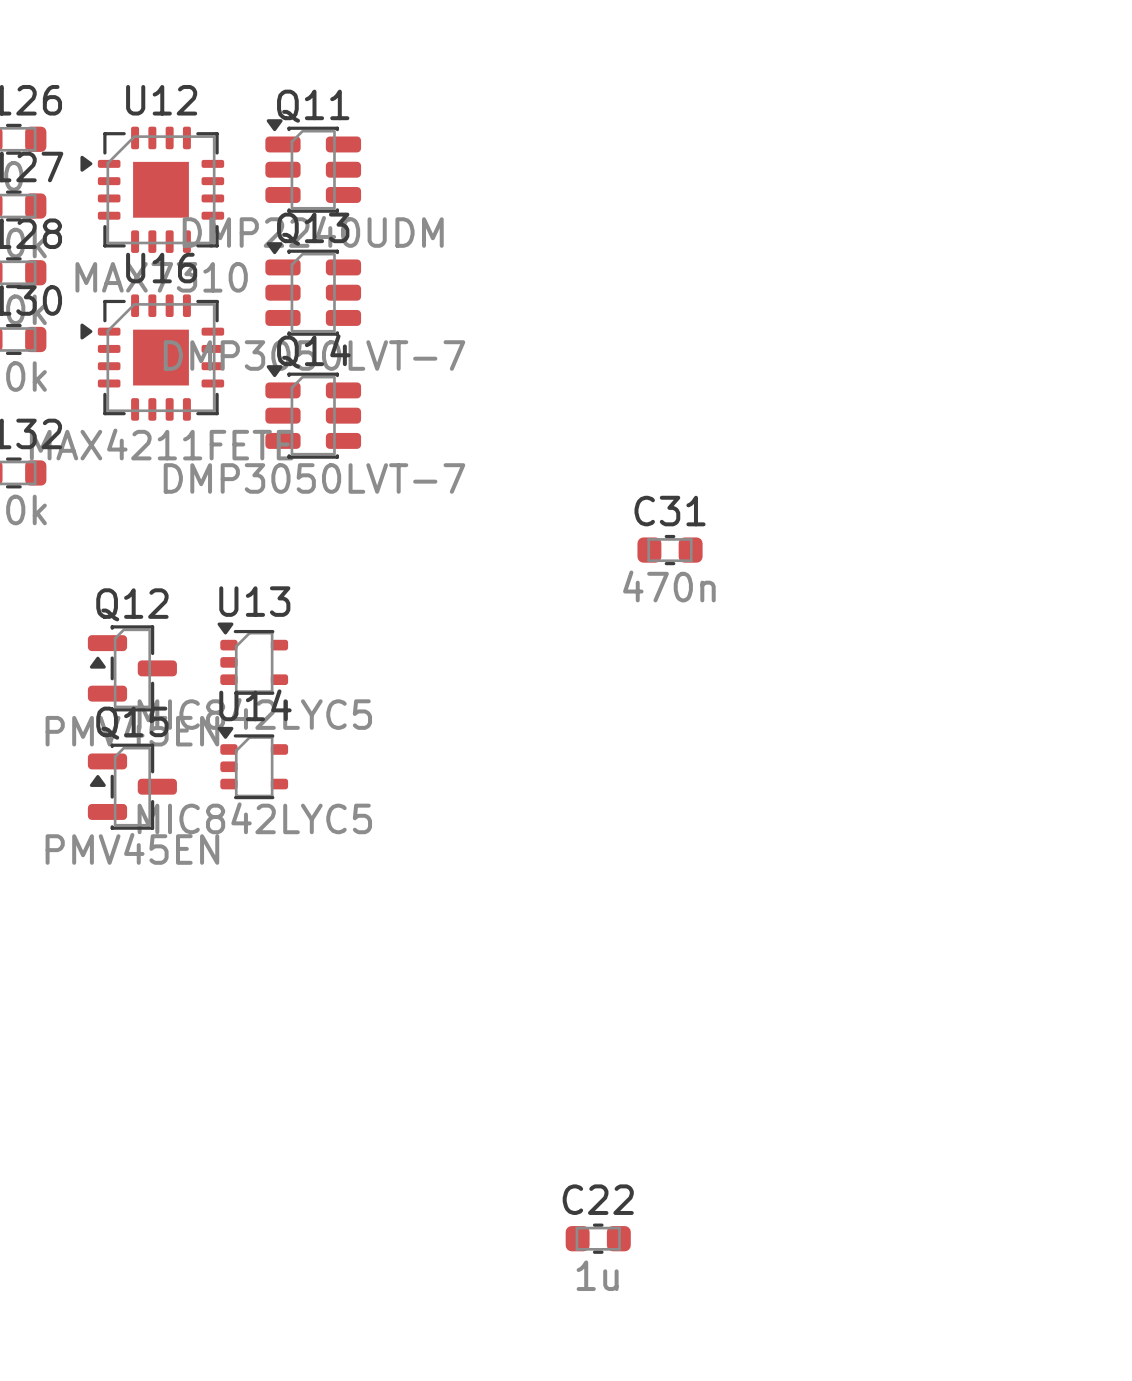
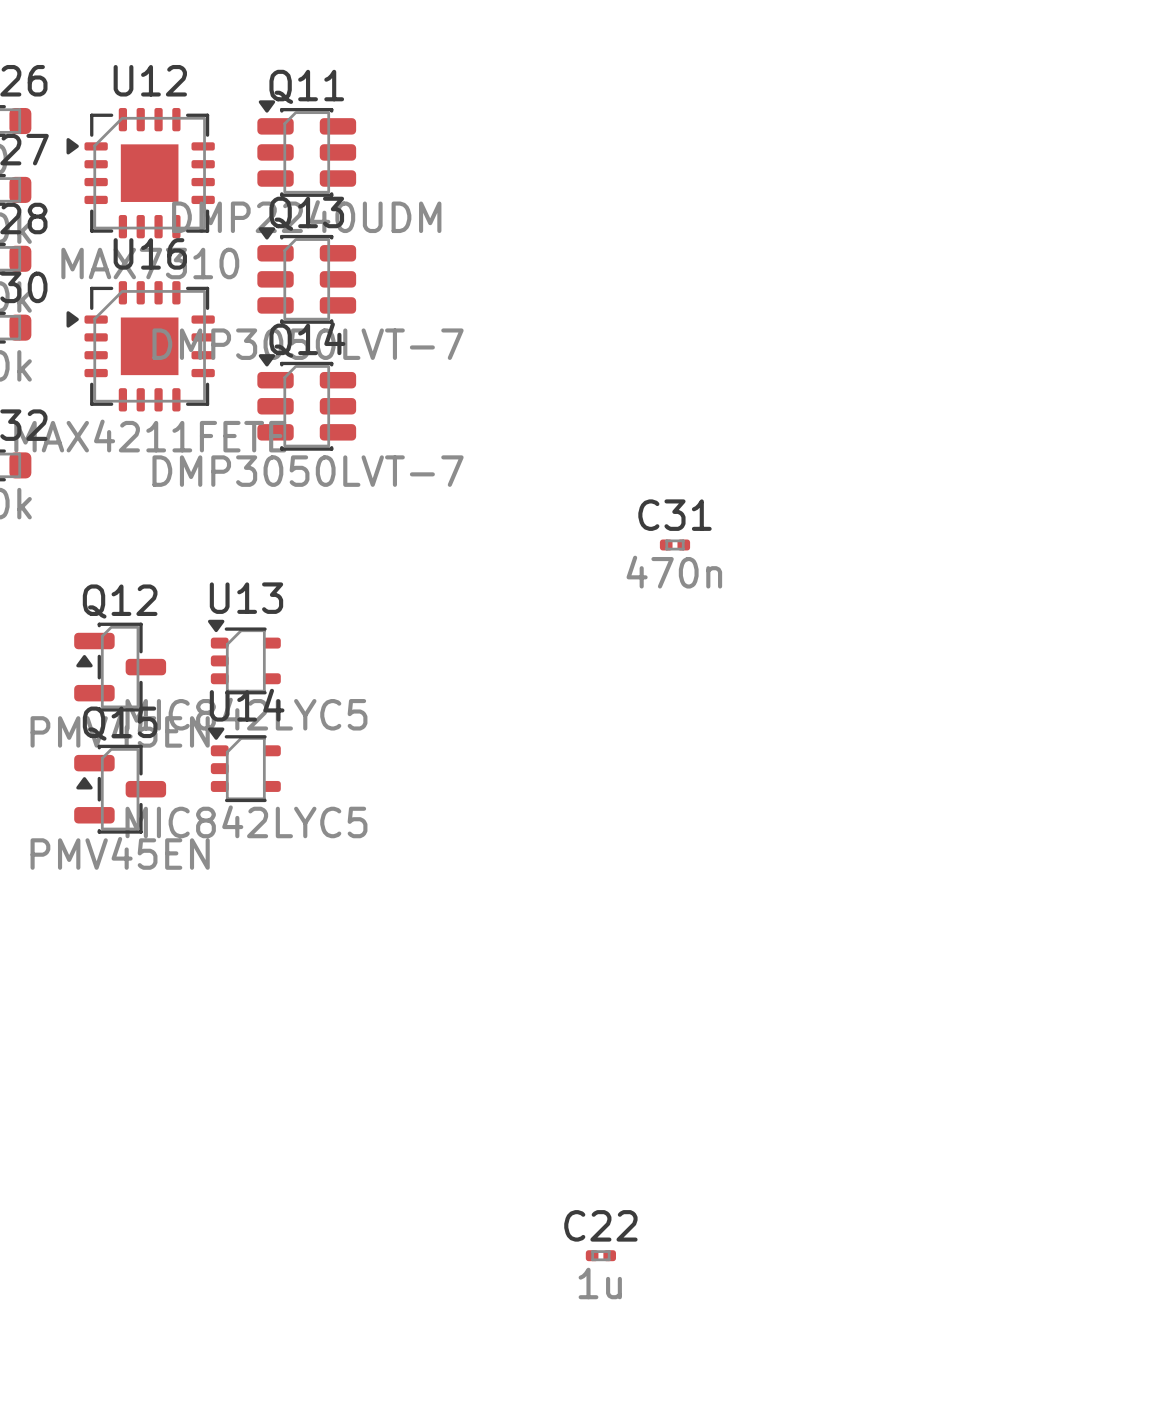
C31 footprint: [637, 534, 703, 566] -> [659, 539, 691, 551]
C22 footprint: [565, 1223, 631, 1254] -> [585, 1250, 617, 1262]

